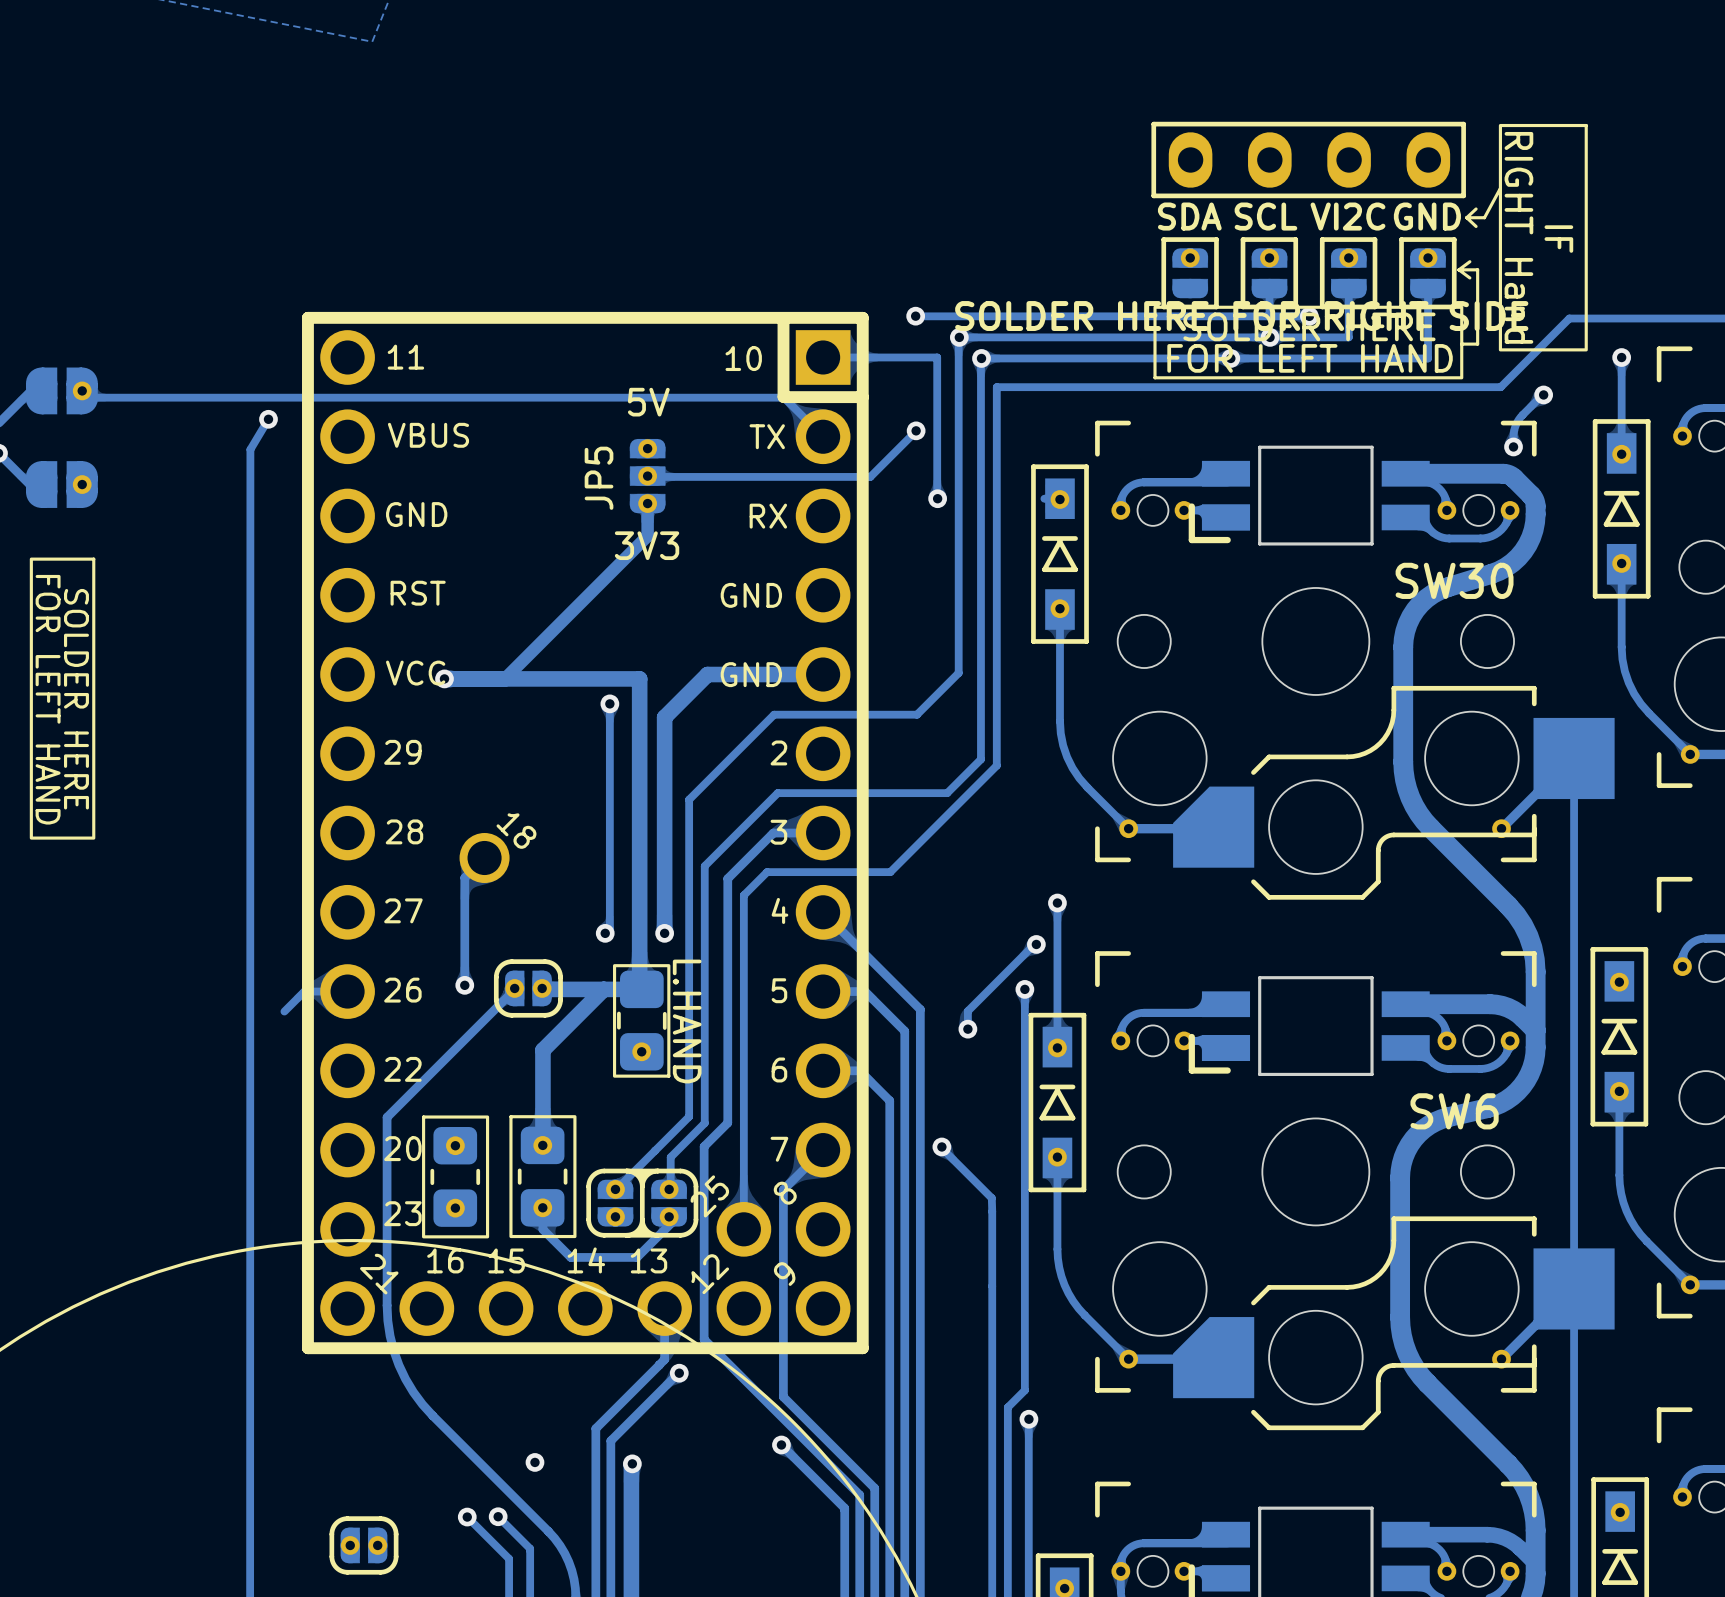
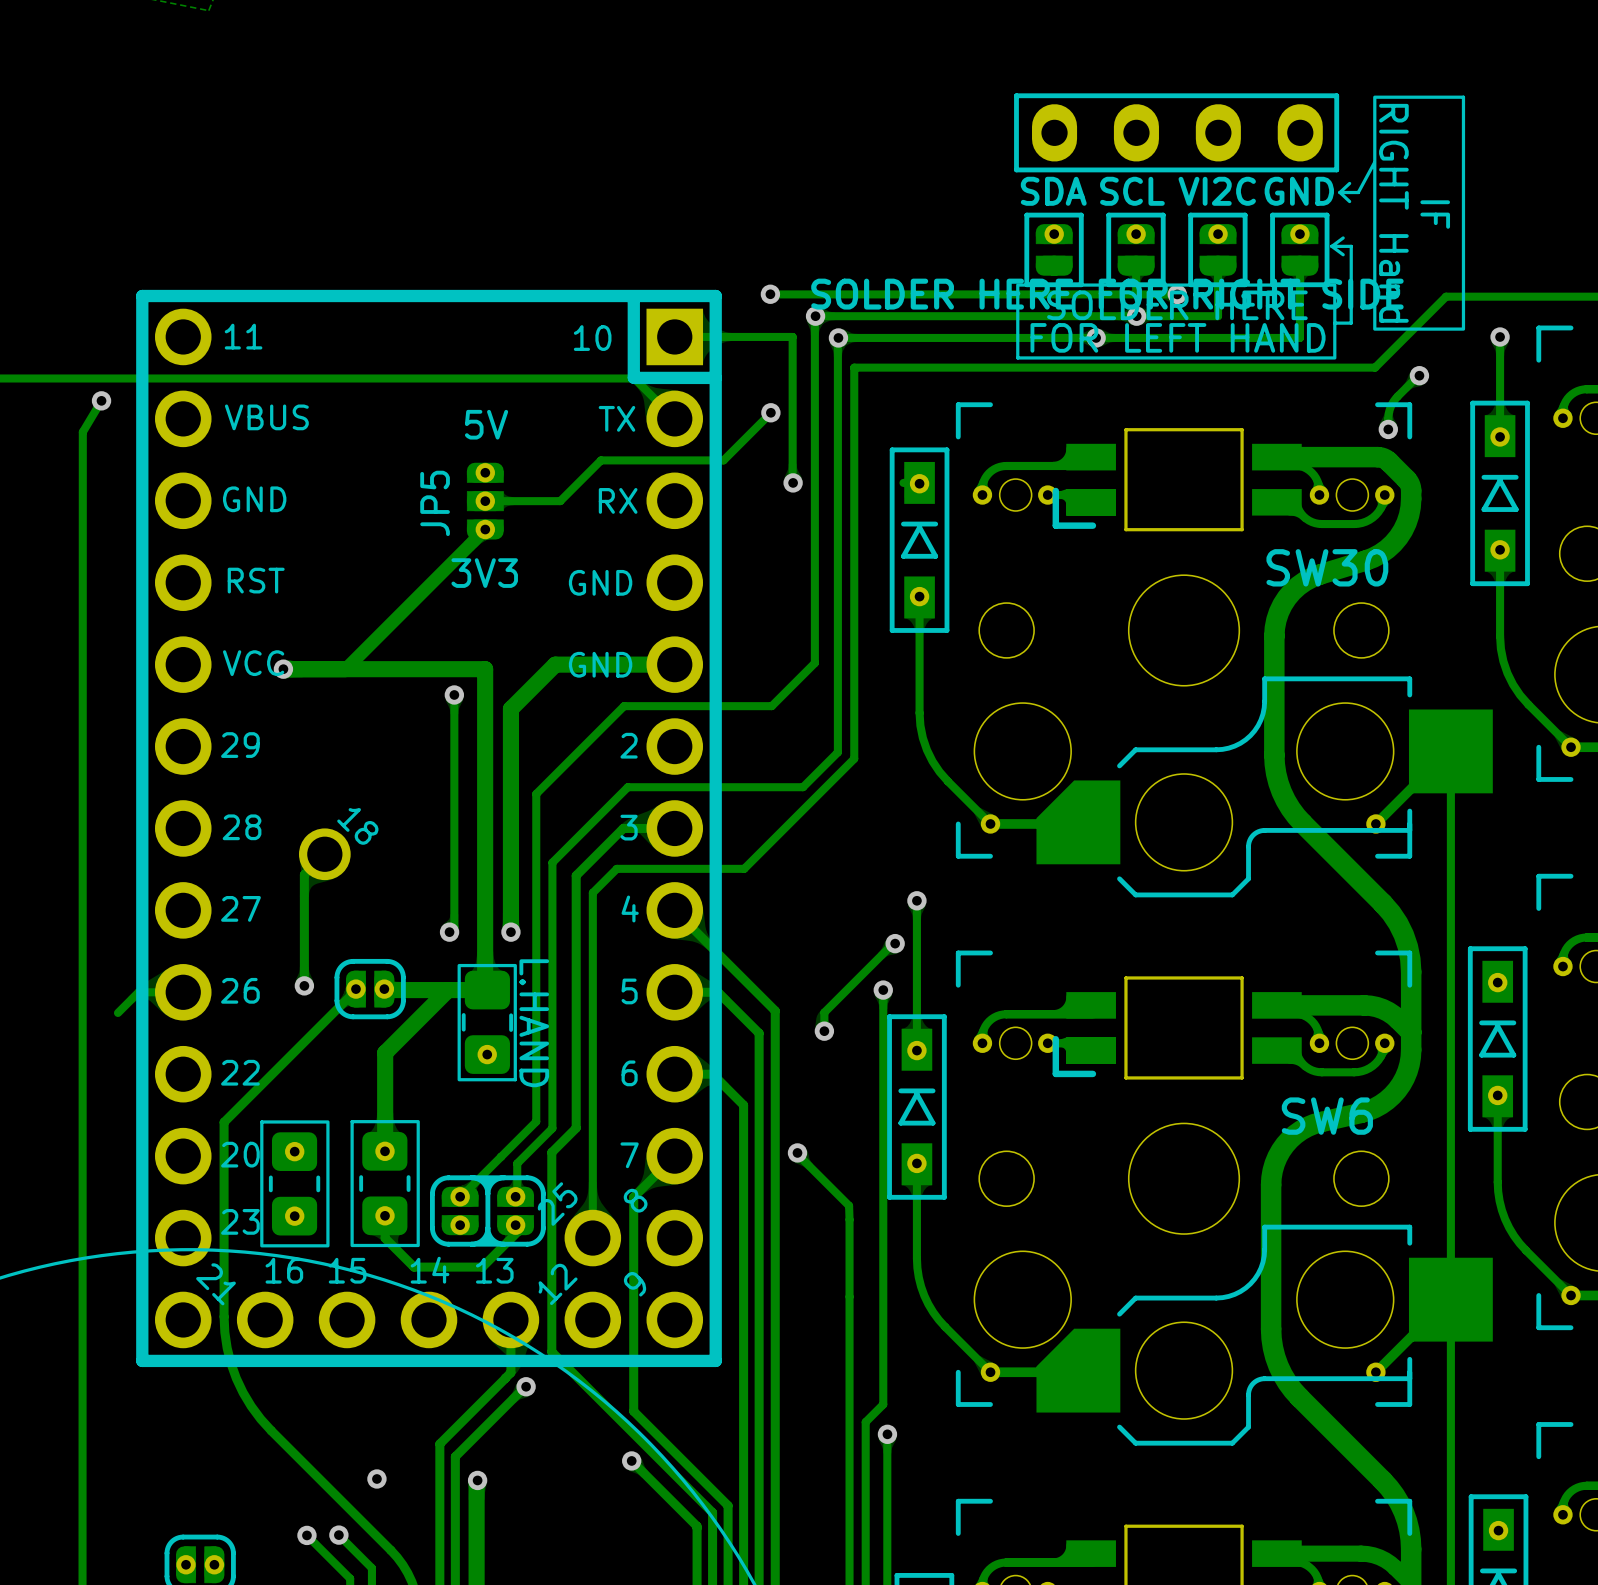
track: (647, 476) (751, 476) -> (485, 501) (560, 501) (601, 460)
JP5 position: (647, 476) -> (485, 501)
track: (647, 503) (647, 536) (639, 543) -> none

